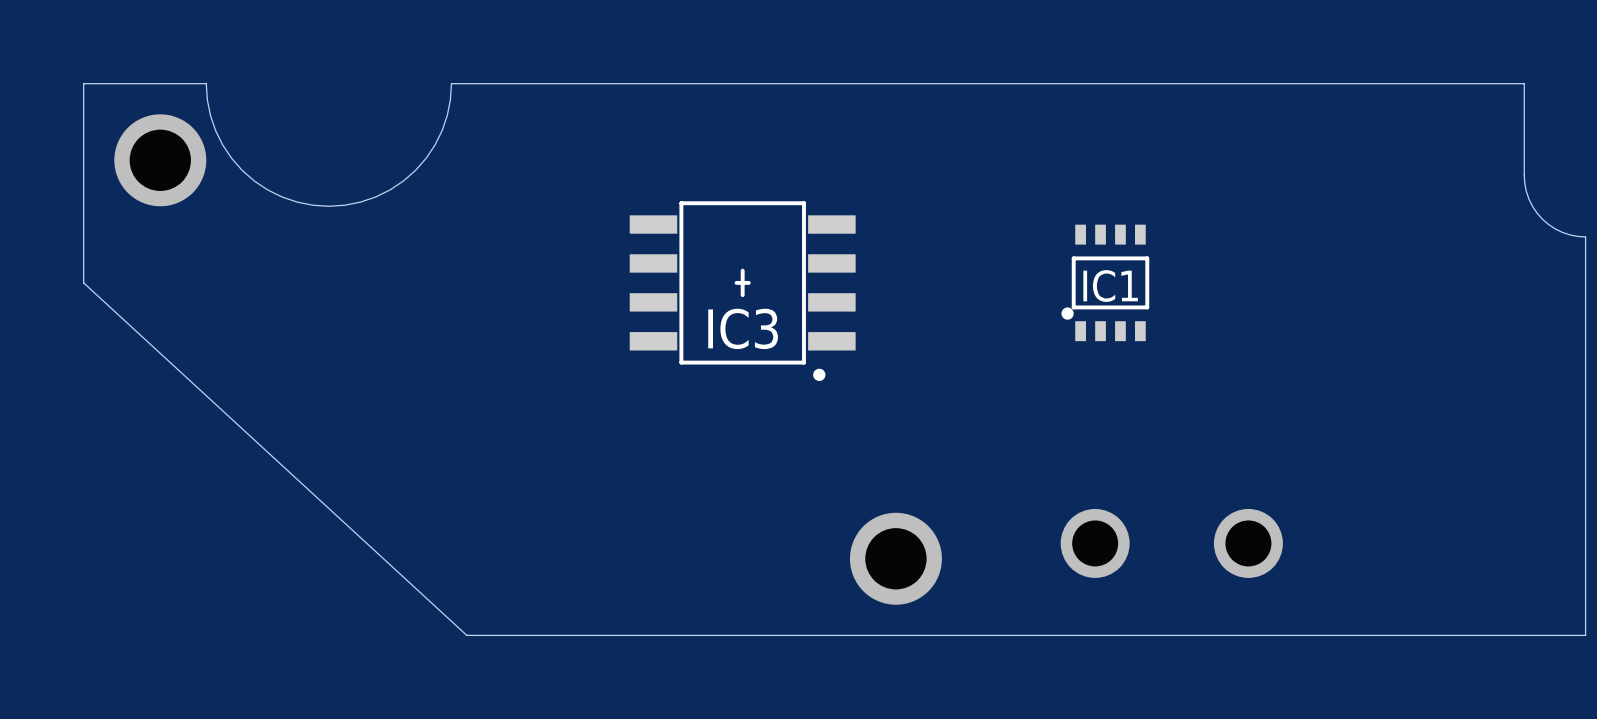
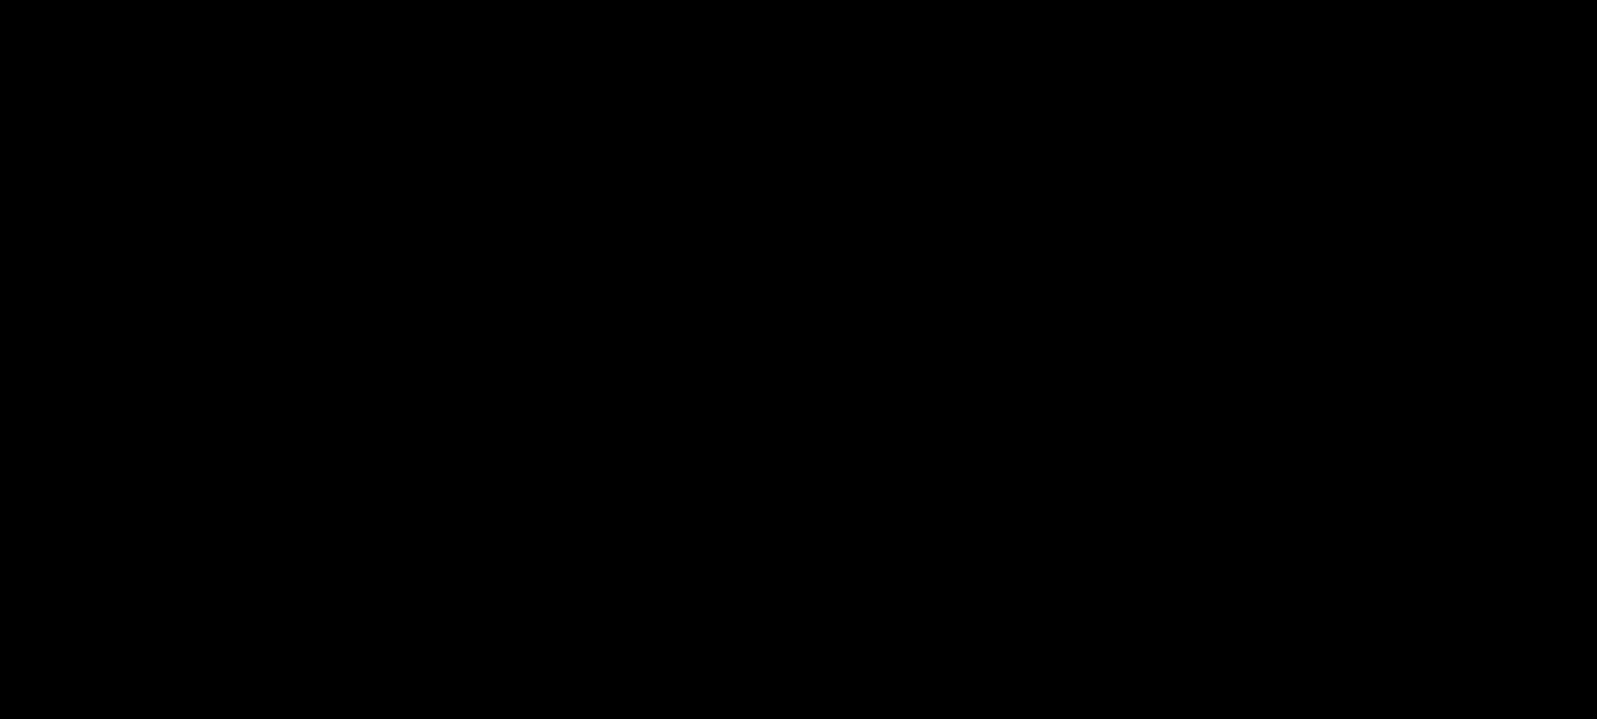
board edge: (1524, 83) (451, 83) (450, 99) (442, 130) (435, 144) (415, 170) (390, 189) (375, 196) (344, 205) (328, 206) (312, 205) (281, 196) (267, 189) (242, 170) (222, 144) (215, 130) (207, 99) (206, 83) (83, 83) (83, 282) (466, 635) (1585, 635) (1585, 236) (1569, 234) (1554, 228) (1542, 218) (1528, 199) (1524, 175) (1524, 83) -> none
via: (160, 160) -> none
IC1: (1105, 282) -> none
IC3: (742, 291) -> none
via: (1095, 543) -> none
via: (1248, 543) -> none
via: (895, 558) -> none

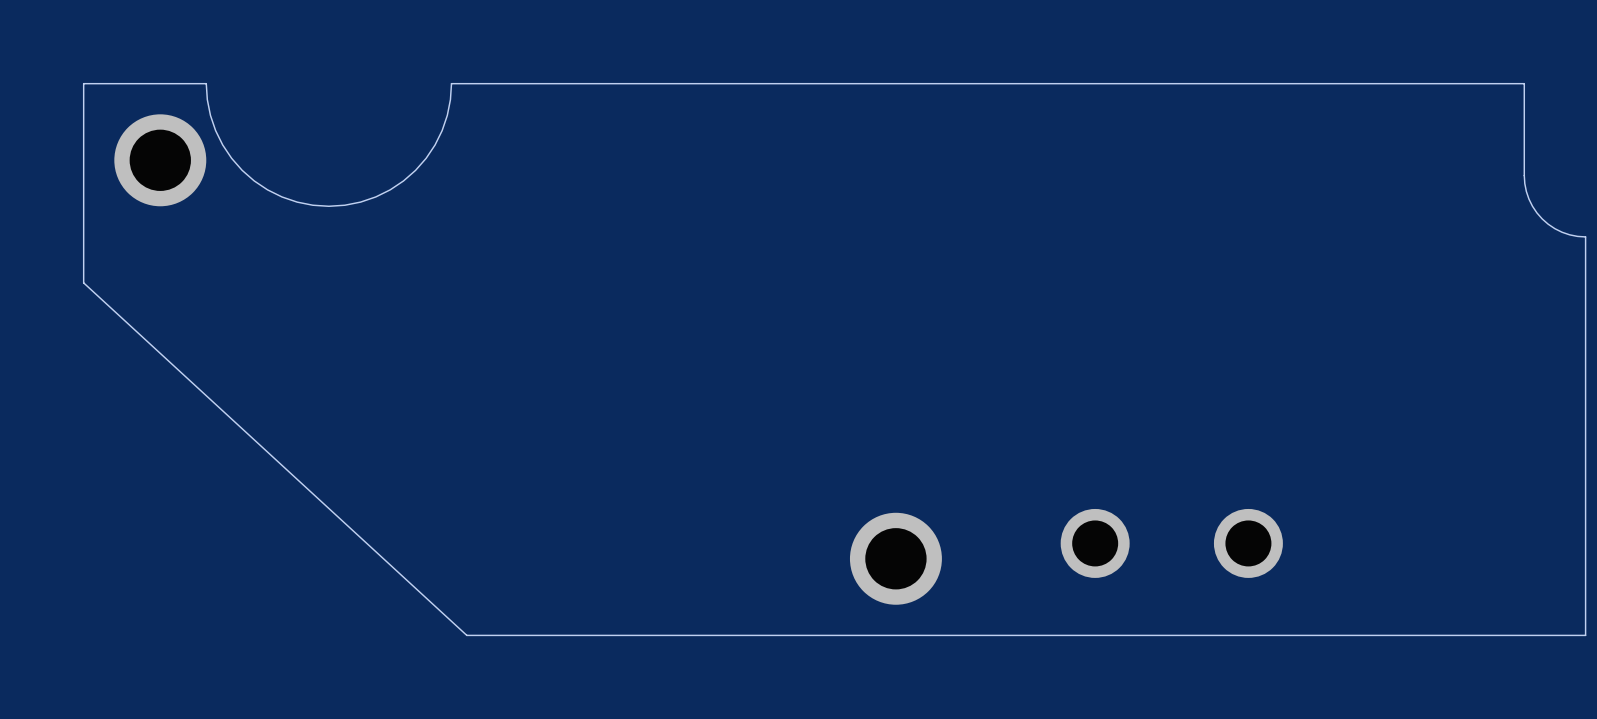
board edge: none -> (1524, 83) (451, 83) (450, 99) (442, 130) (435, 144) (415, 170) (390, 189) (375, 196) (344, 205) (328, 206) (312, 205) (281, 196) (267, 189) (242, 170) (222, 144) (215, 130) (207, 99) (206, 83) (83, 83) (83, 282) (466, 635) (1585, 635) (1585, 236) (1569, 234) (1554, 228) (1542, 218) (1528, 199) (1524, 175) (1524, 83)
via: none -> (160, 160)
via: none -> (1095, 543)
via: none -> (1248, 543)
via: none -> (895, 558)

